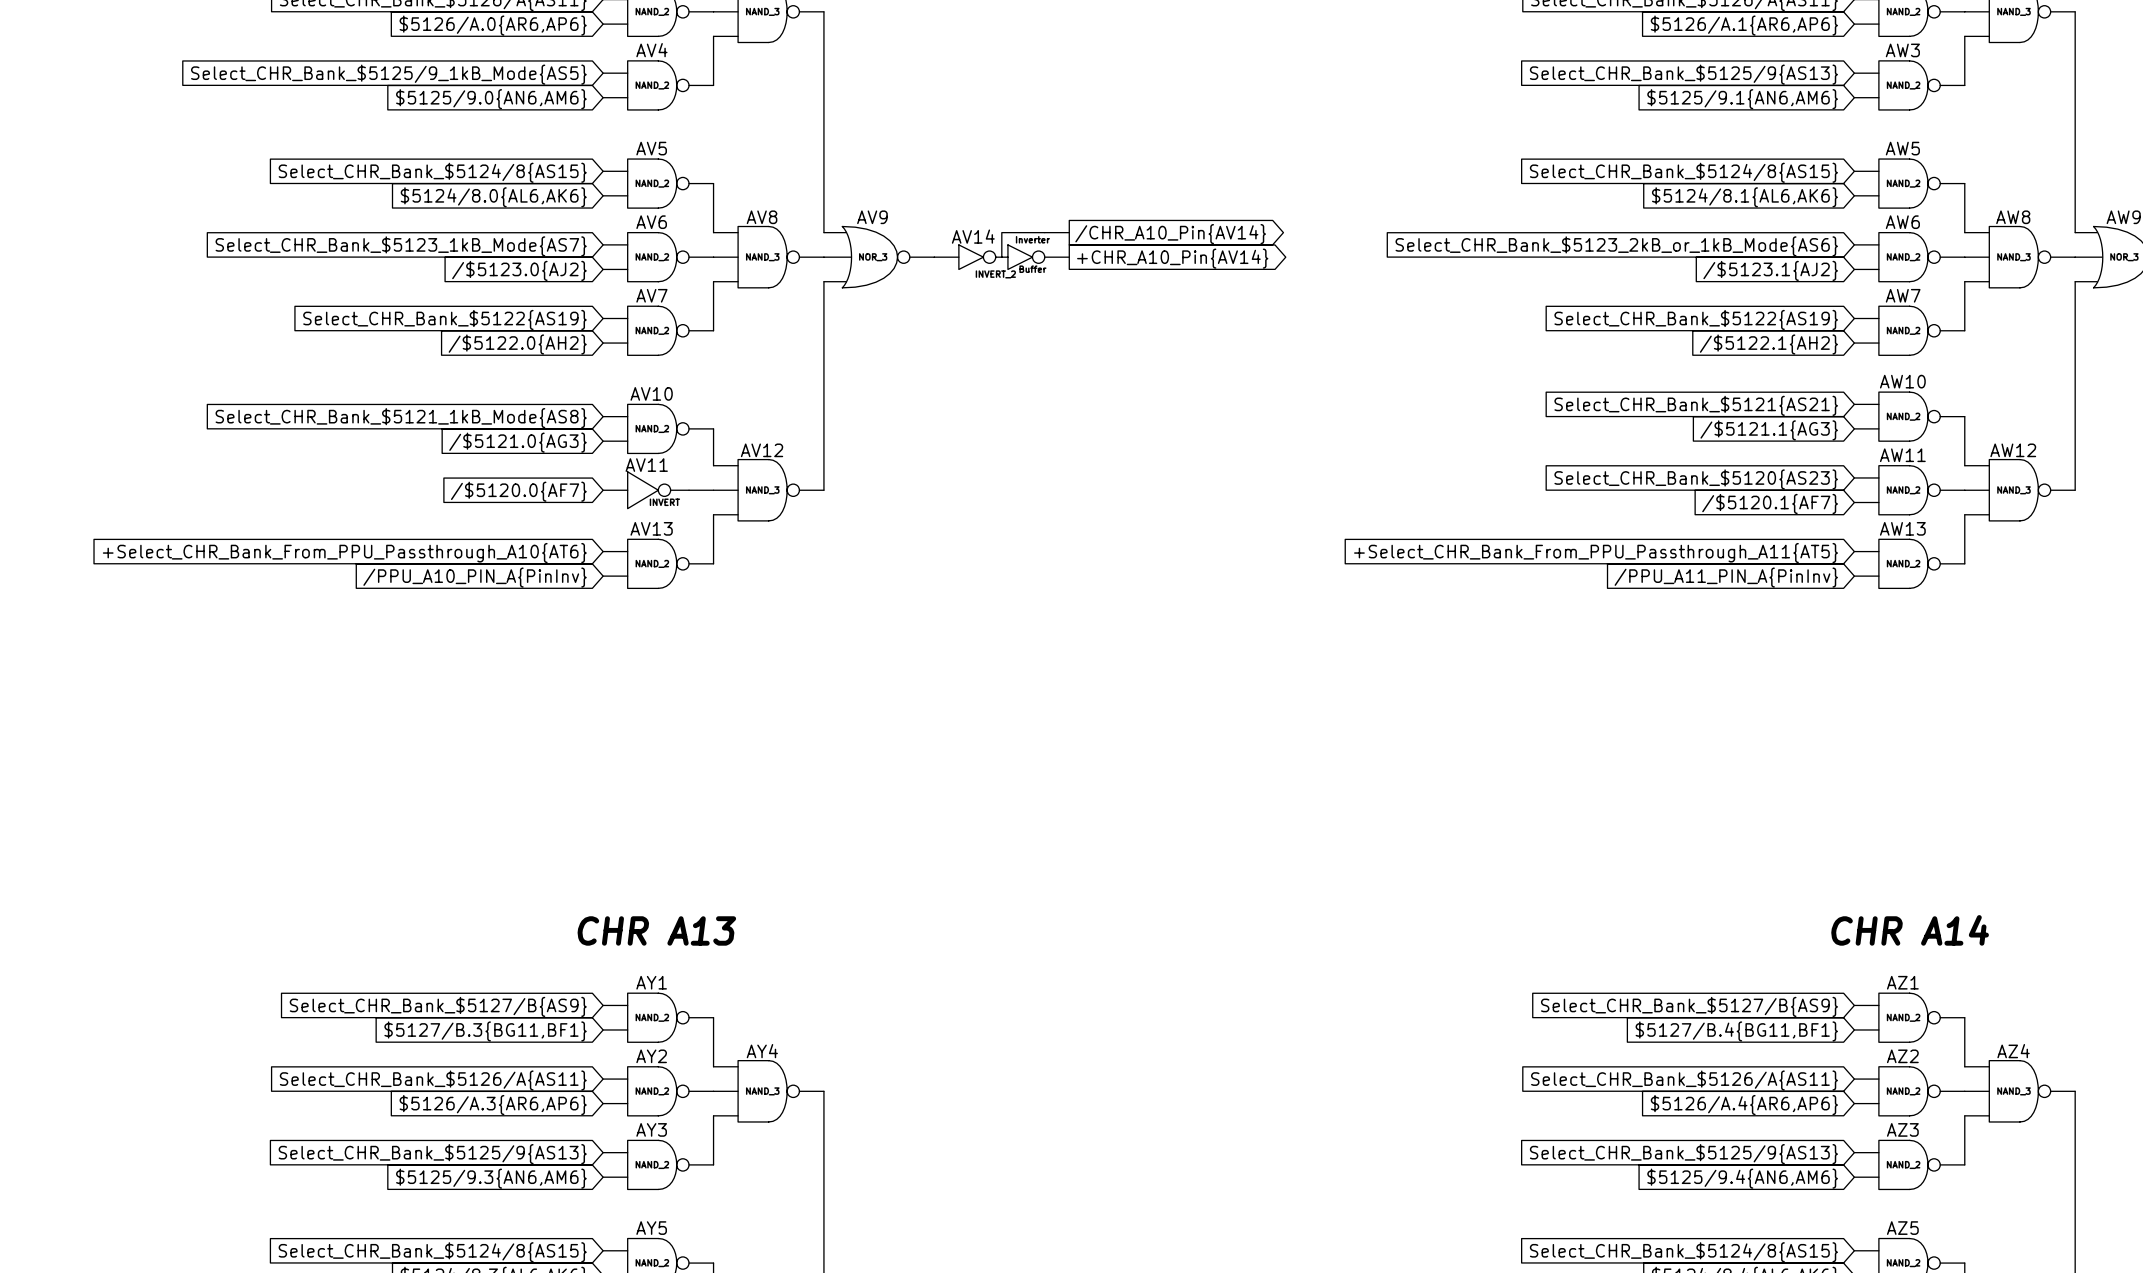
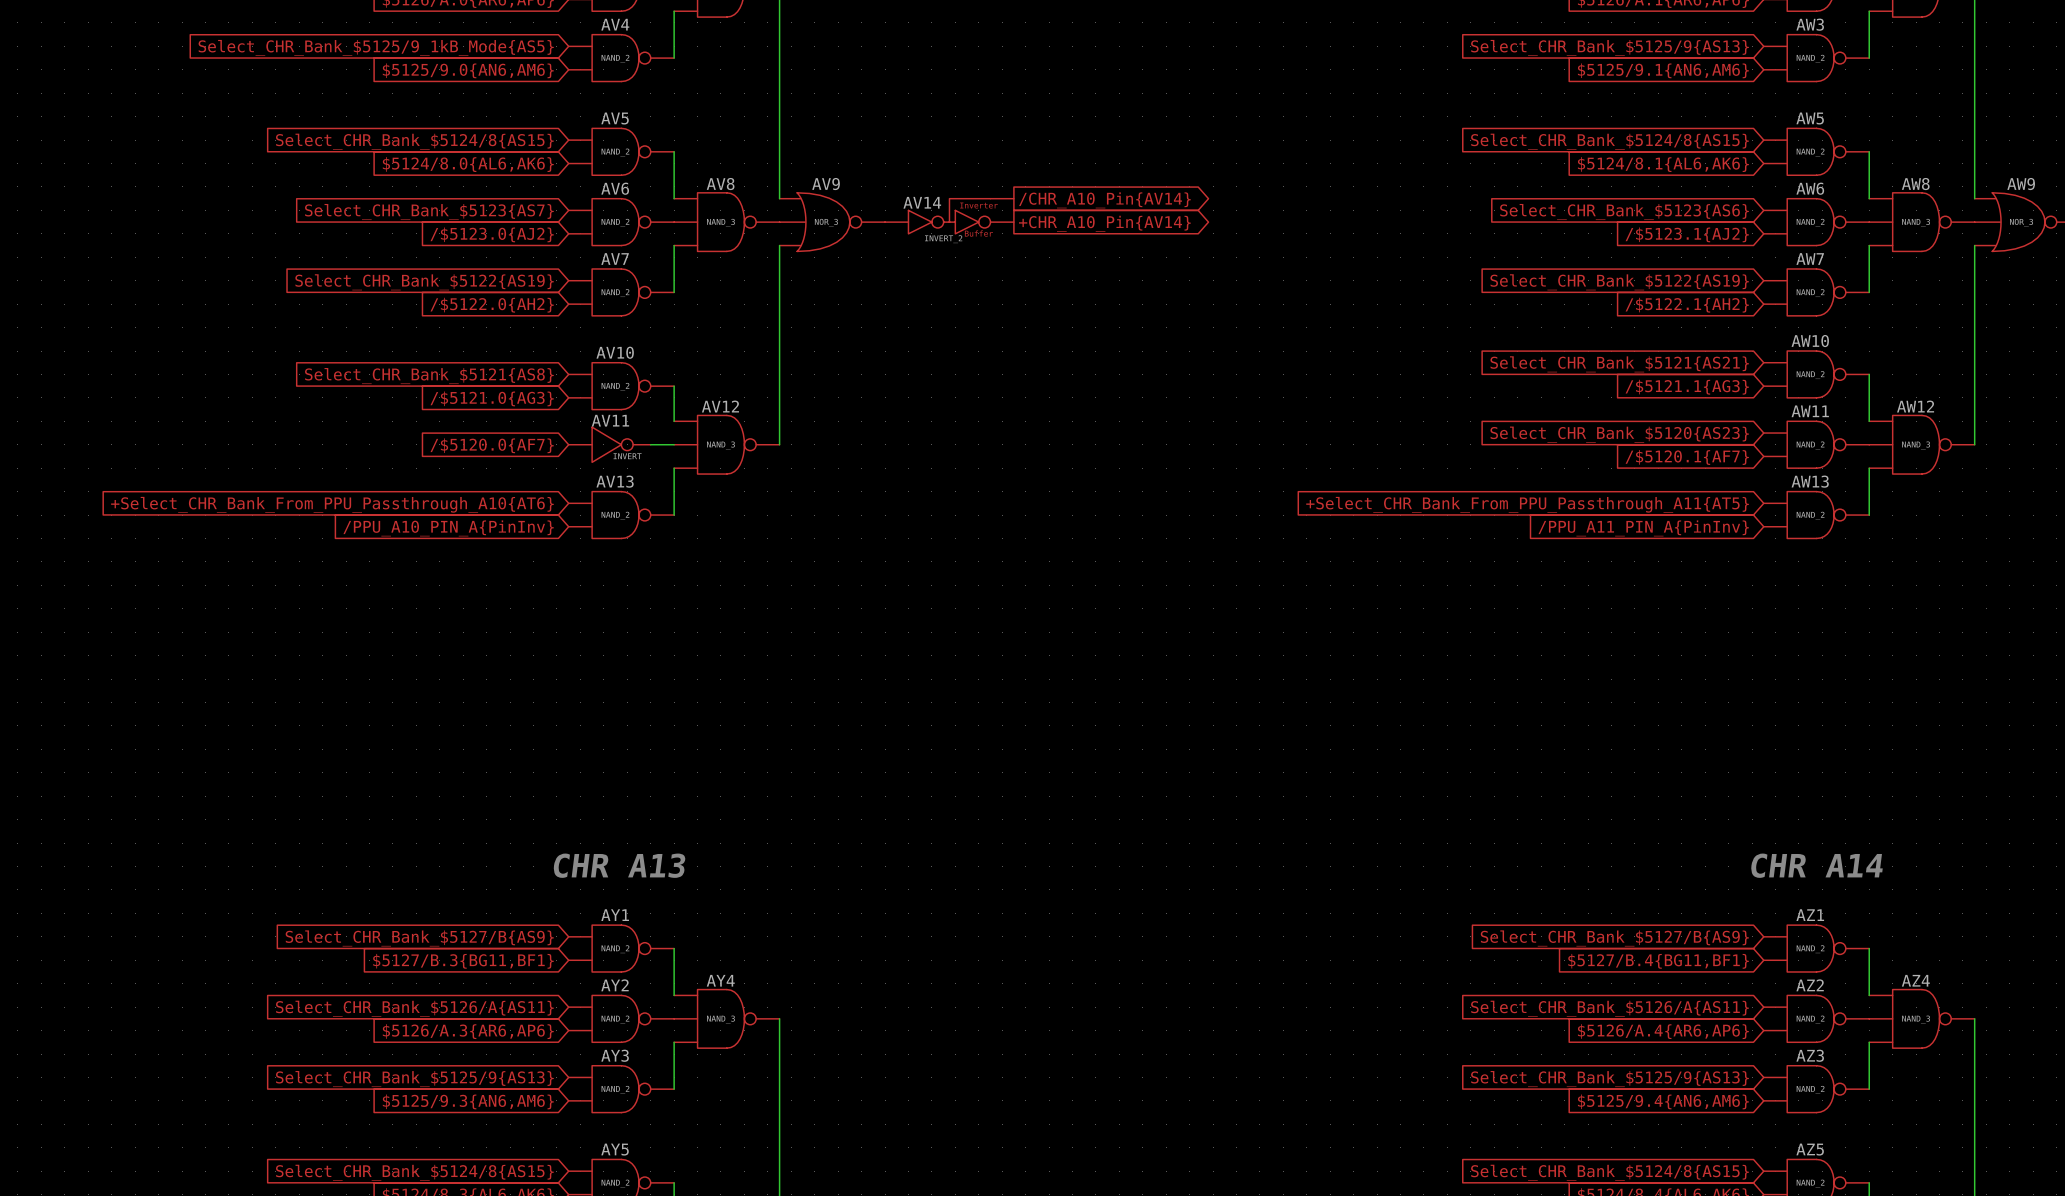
global label: Select_CHR_Bank_$5123_1kB_Mode{AS7} (401, 246) -> Select_CHR_Bank_$5123{AS7} (429, 212)
global label: Select_CHR_Bank_$5123_2kB_or_1kB_Mode{AS6} (1616, 246) -> Select_CHR_Bank_$5123{AS6} (1624, 212)
global label: Select_CHR_Bank_$5121_1kB_Mode{AS8} (401, 418) -> Select_CHR_Bank_$5121{AS8} (429, 376)

